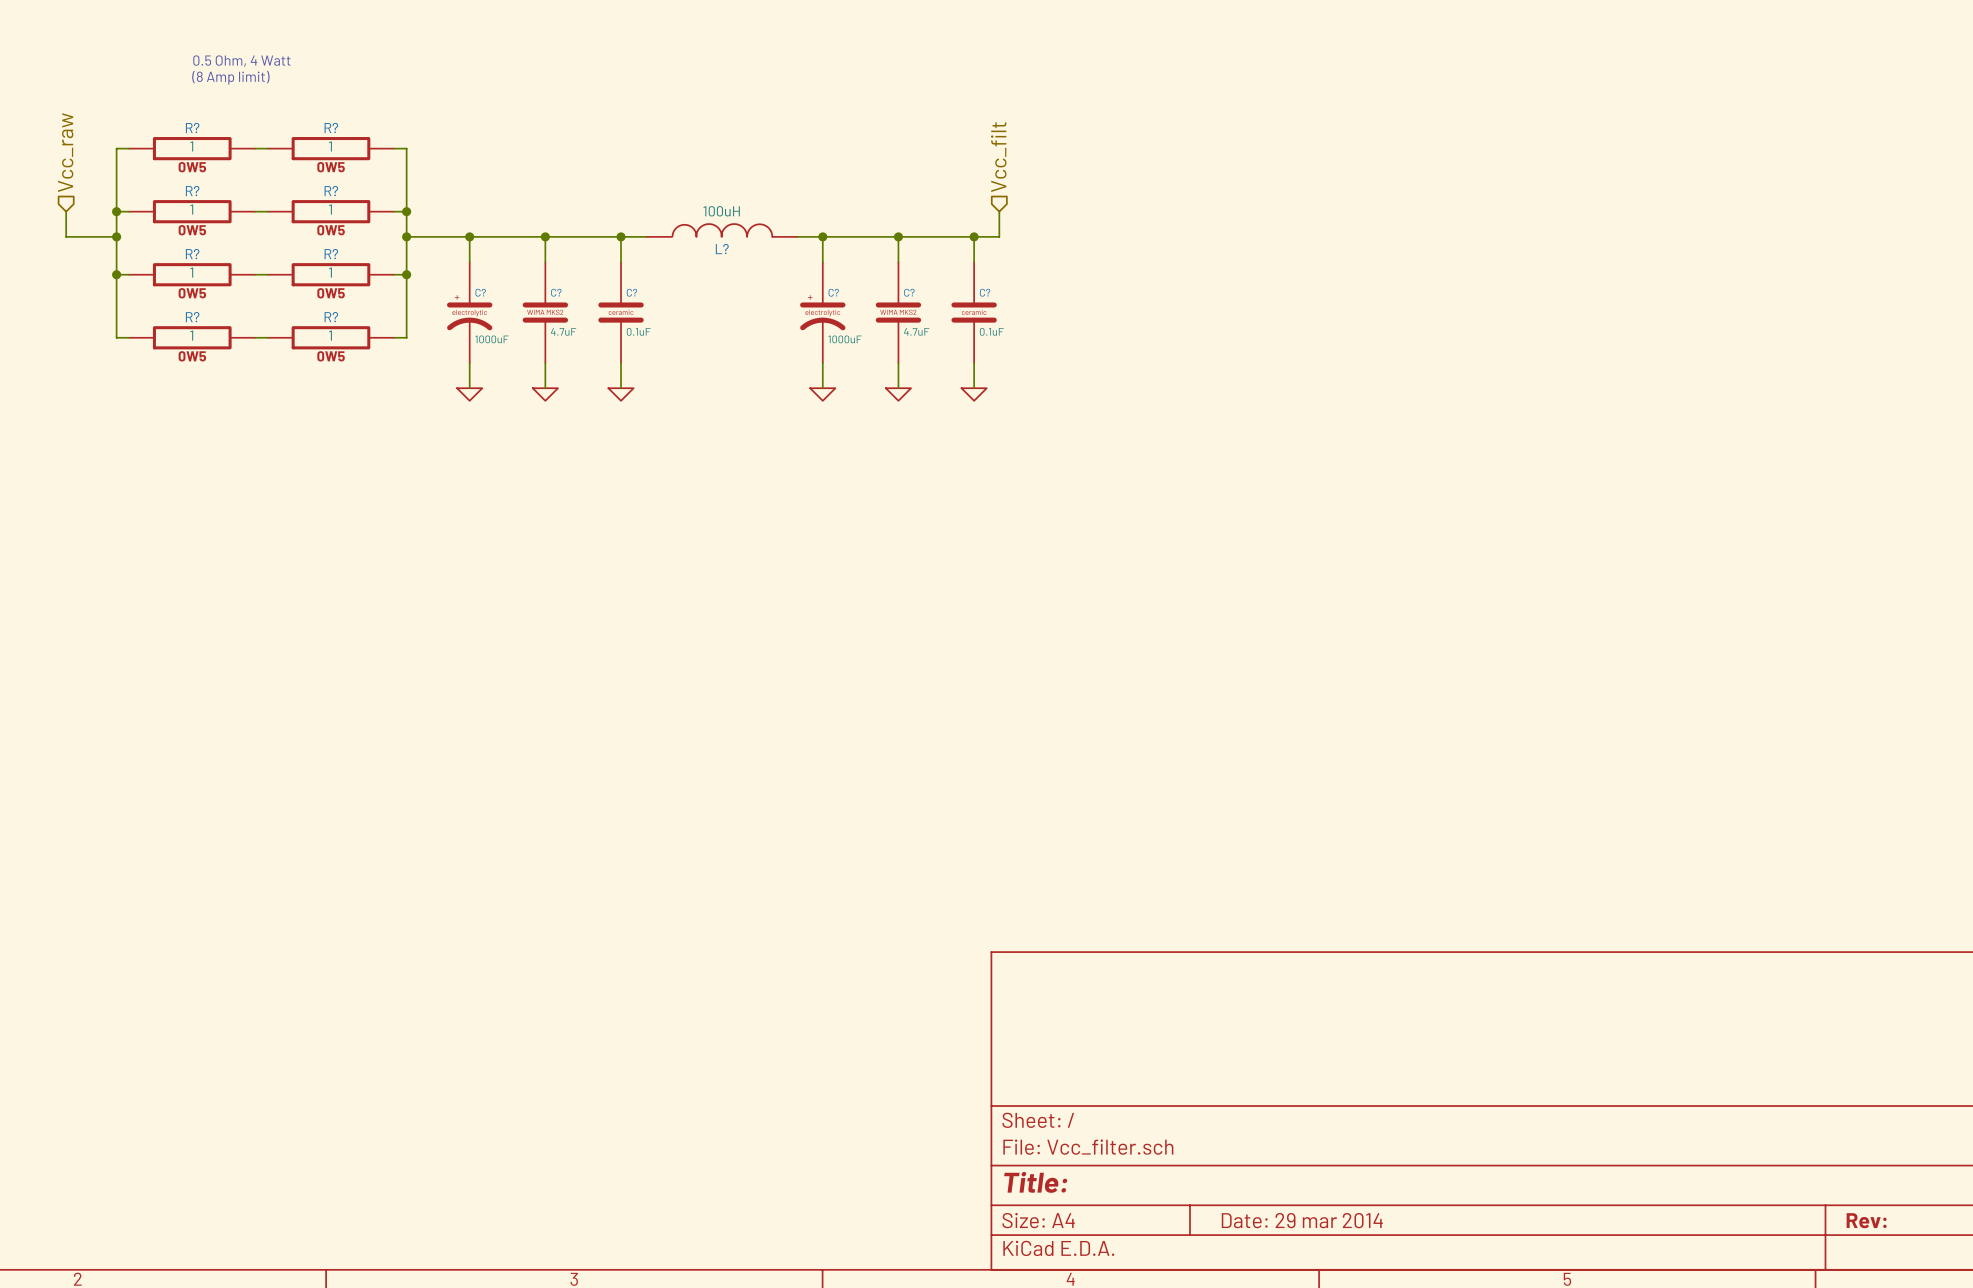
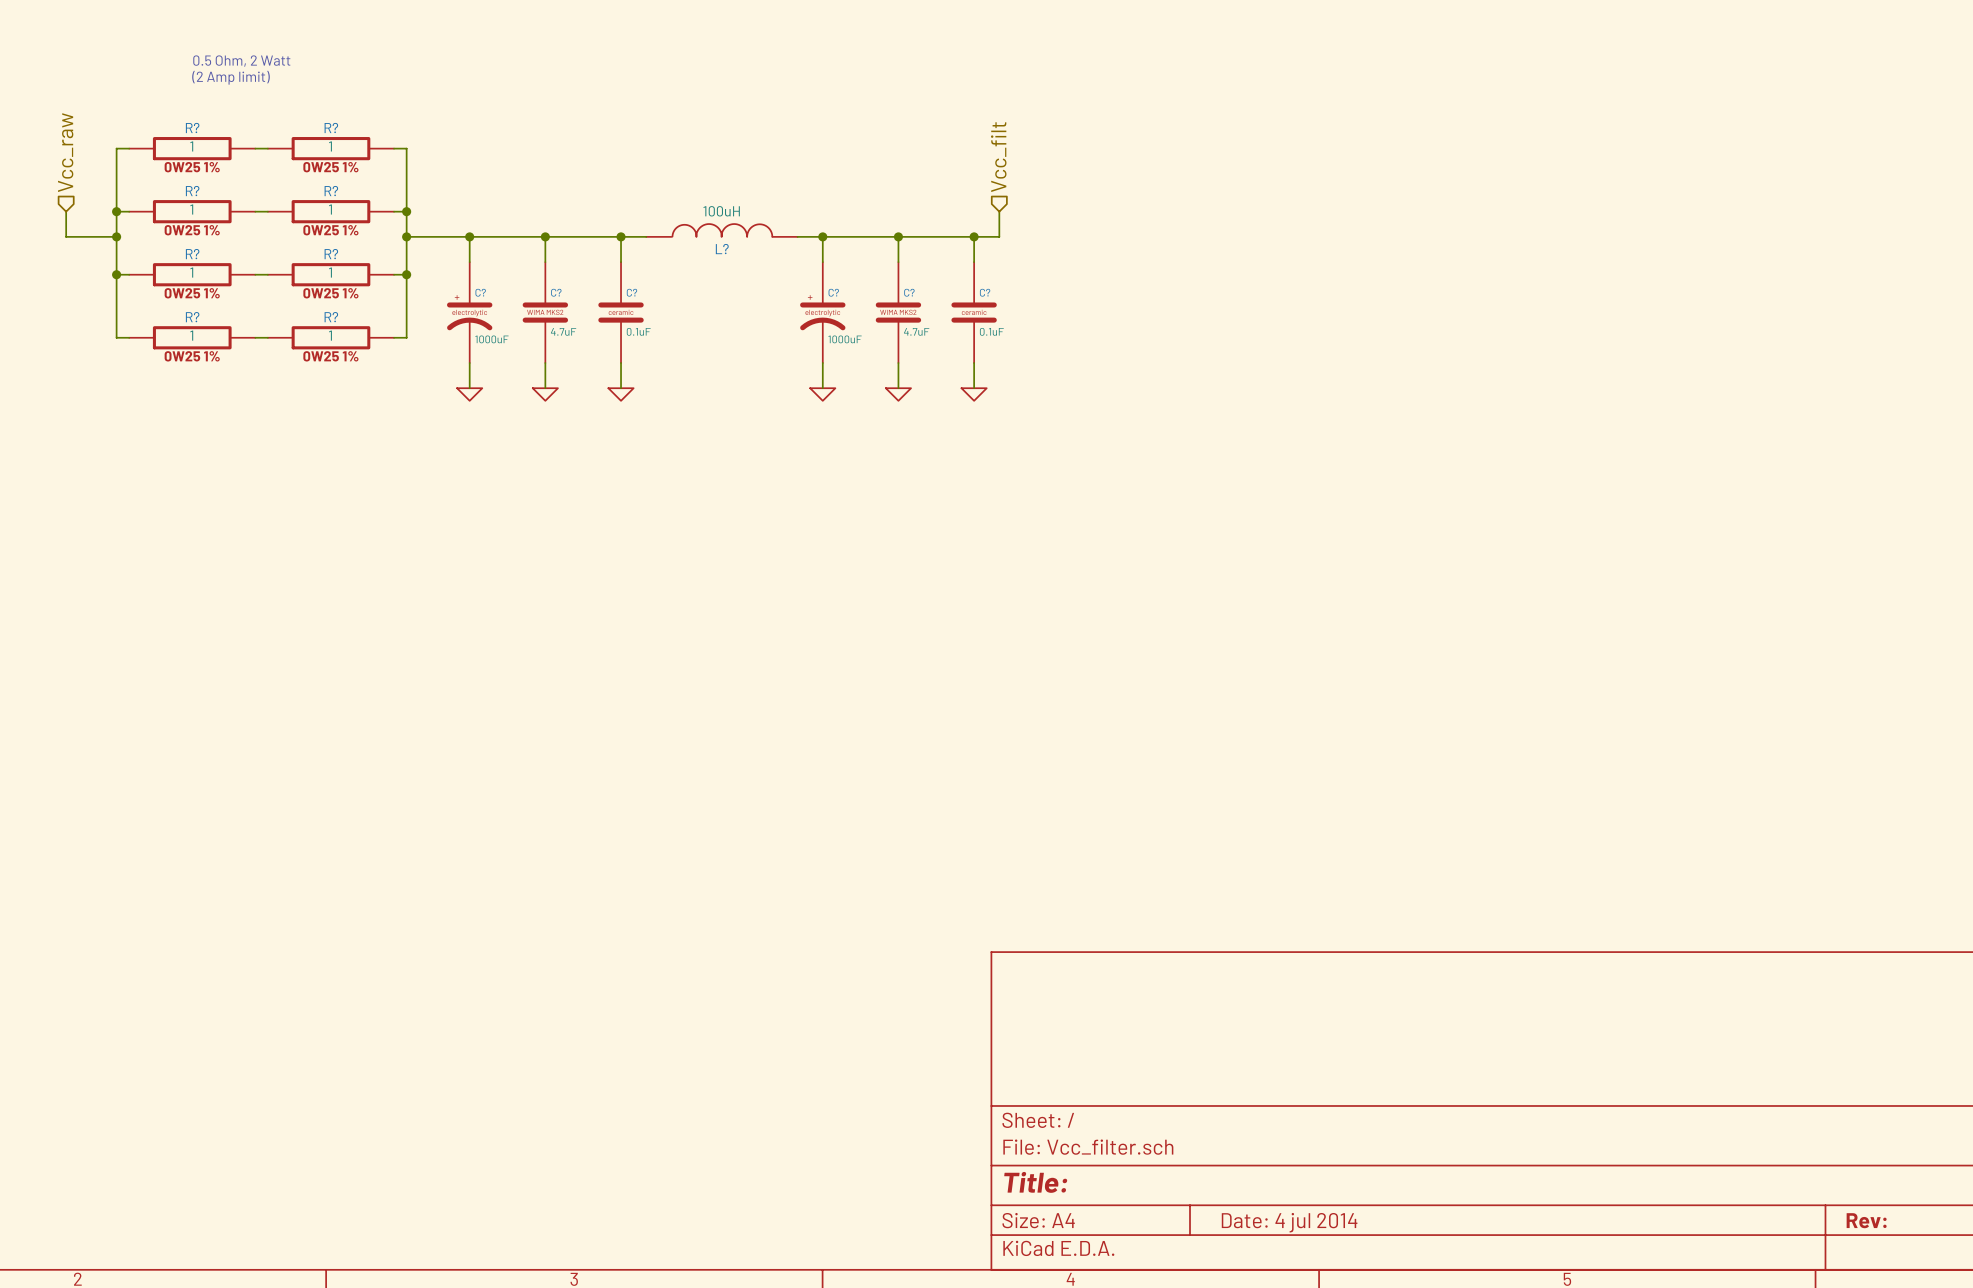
text: 0.5 Ohm, 4 Watt (241, 61) -> 0.5 Ohm, 2 Watt (241, 61)
text: (8 Amp limit) (230, 77) -> (2 Amp limit) (230, 77)
R? text: 0W5 (192, 167) -> 0W25 1% (192, 167)
R? text: 0W5 (331, 167) -> 0W25 1% (330, 167)
R? text: 0W5 (192, 230) -> 0W25 1% (192, 230)
R? text: 0W5 (331, 230) -> 0W25 1% (330, 230)
R? text: 0W5 (192, 293) -> 0W25 1% (192, 293)
R? text: 0W5 (331, 293) -> 0W25 1% (330, 293)
R? text: 0W5 (192, 356) -> 0W25 1% (192, 356)
R? text: 0W5 (331, 356) -> 0W25 1% (330, 356)
title block: Date: 29 mar 2014 (1302, 1220) -> Date: 4 jul 2014 (1289, 1222)

